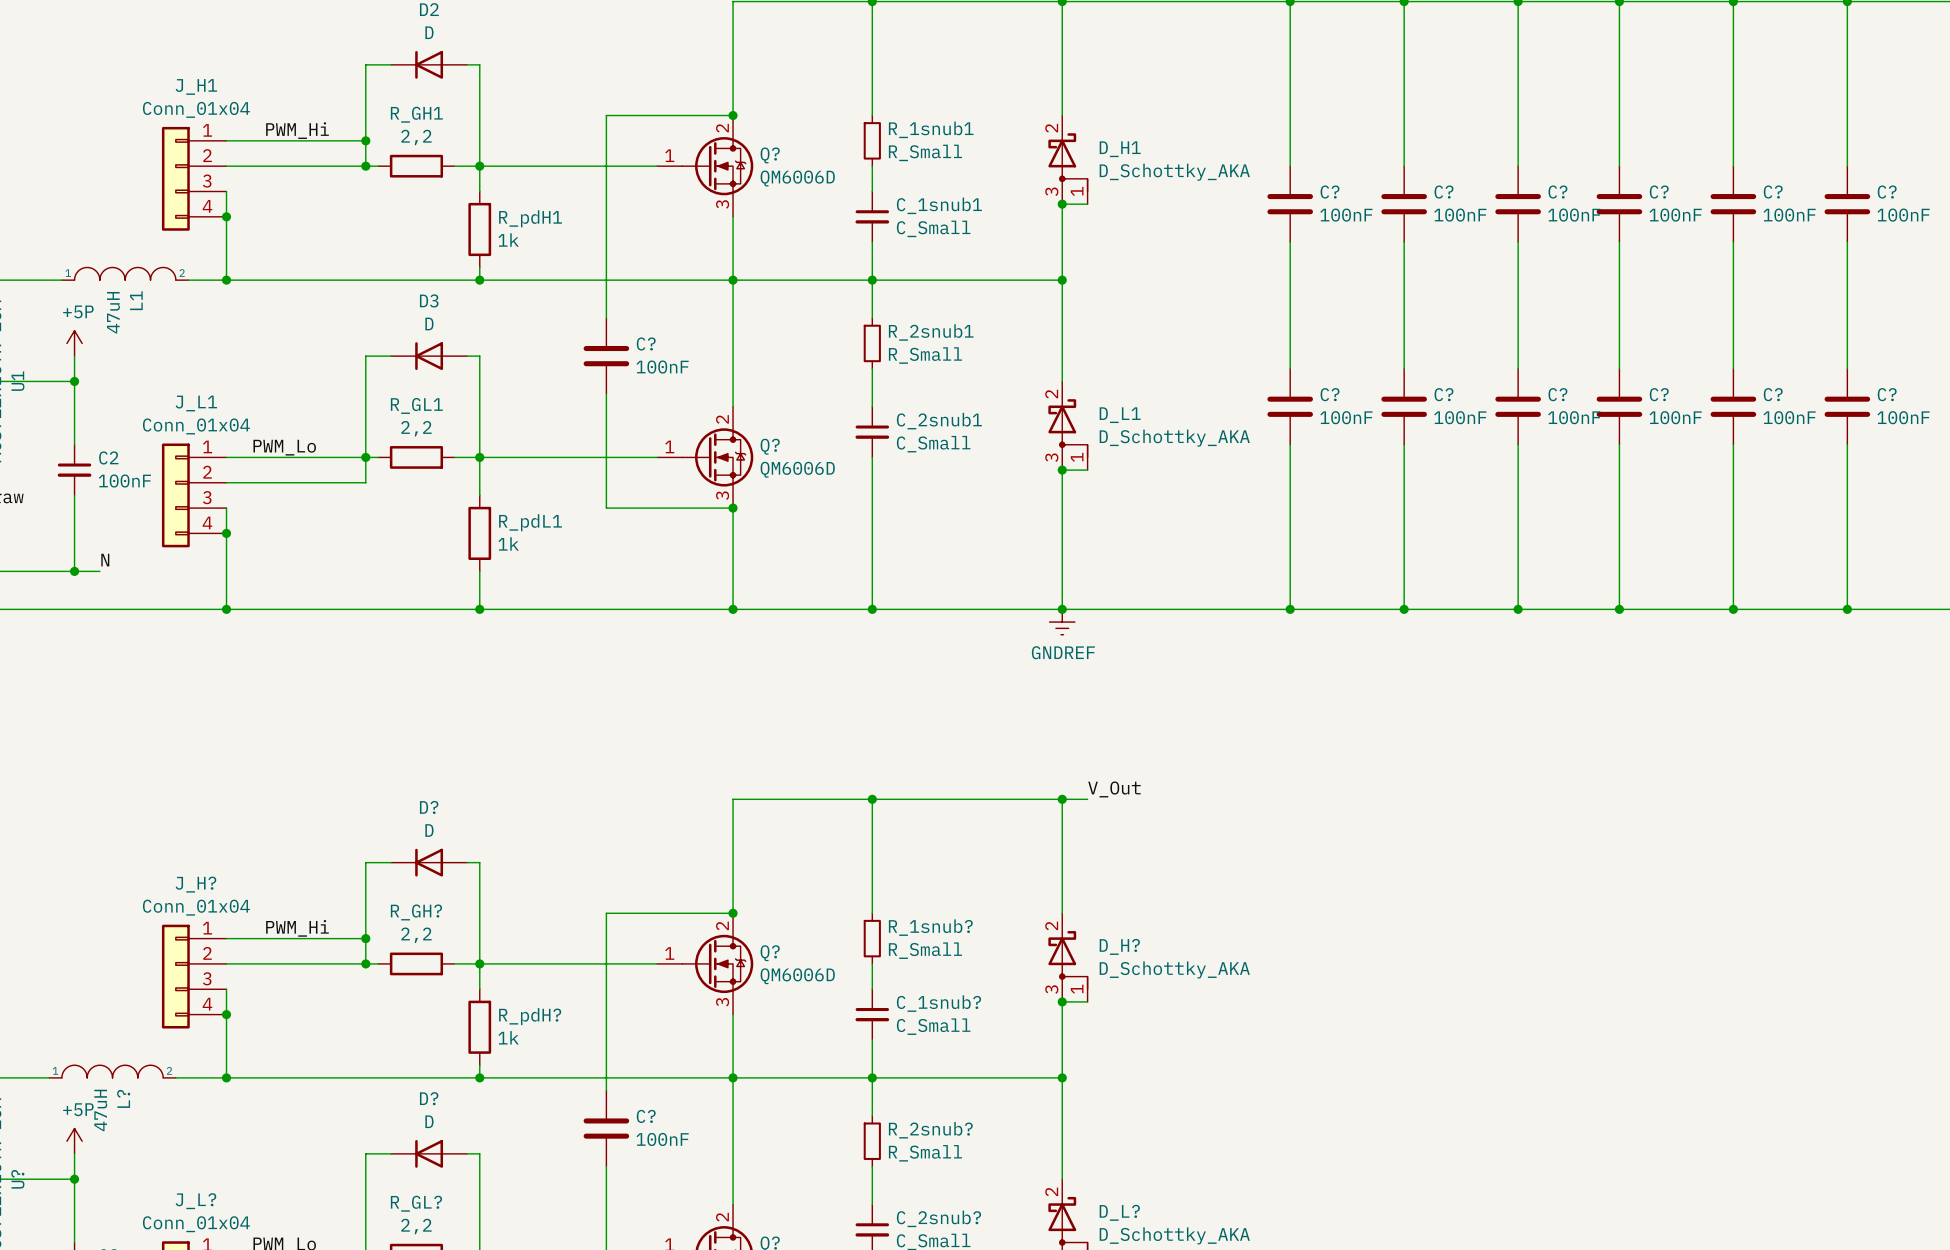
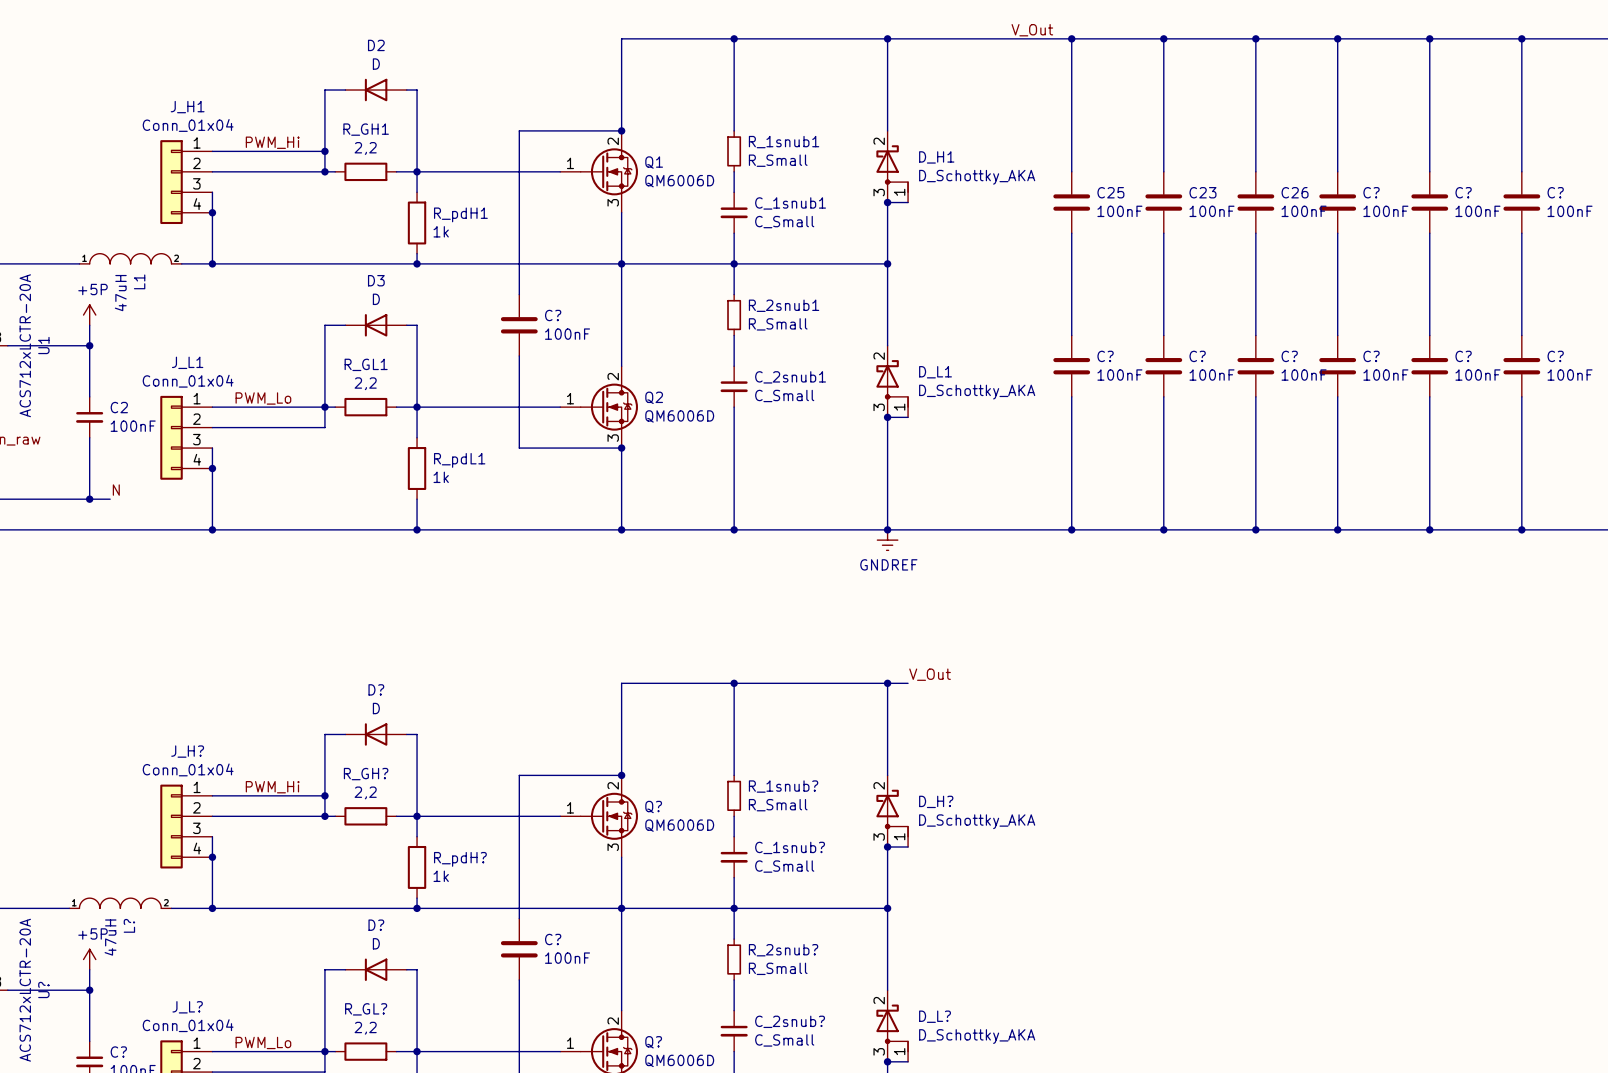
Q? name: Q? (770, 155) -> Q1 (654, 162)
C? name: C? (1330, 192) -> C25 (1110, 192)
C? name: C? (1443, 192) -> C23 (1202, 192)
C? name: C? (1557, 192) -> C26 (1295, 192)
Q? name: Q? (770, 446) -> Q2 (654, 397)

